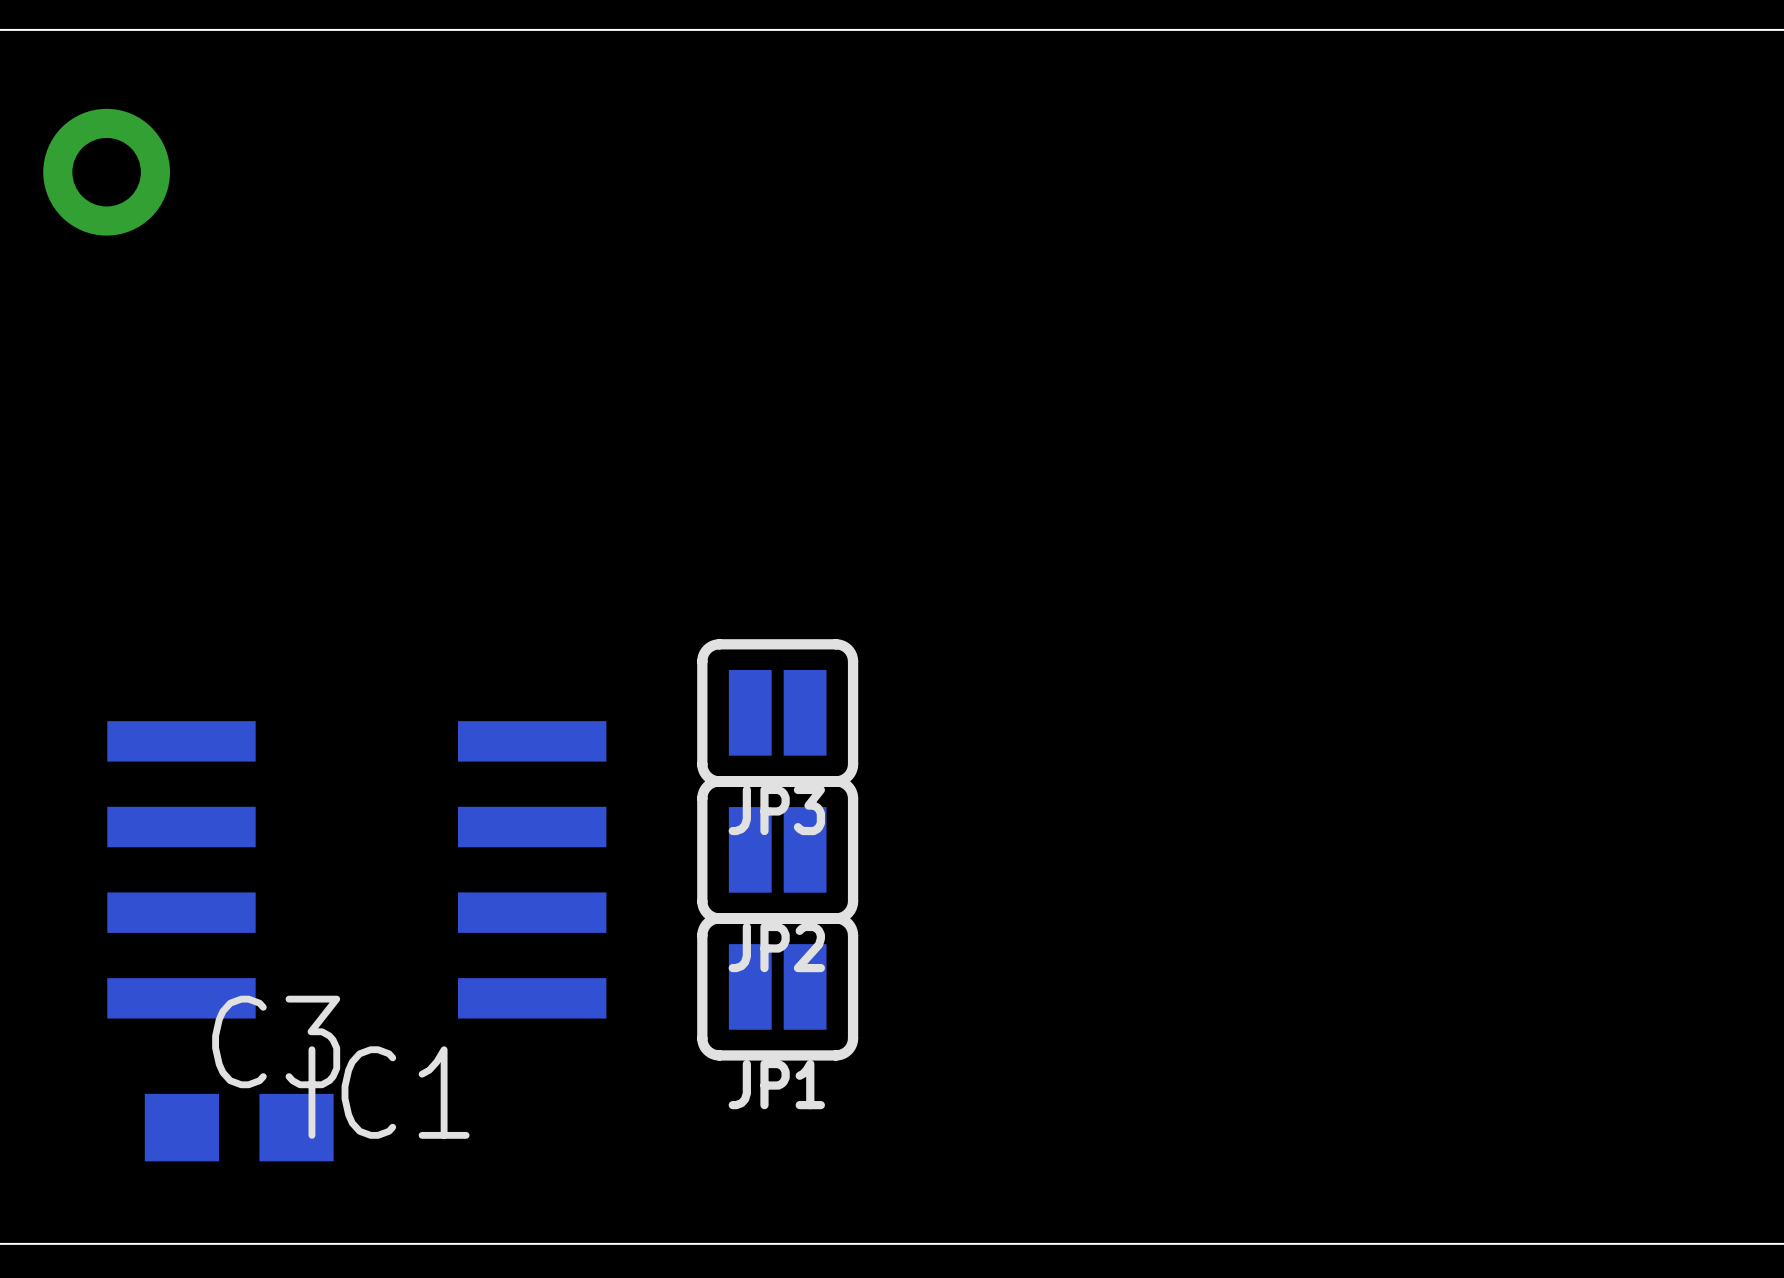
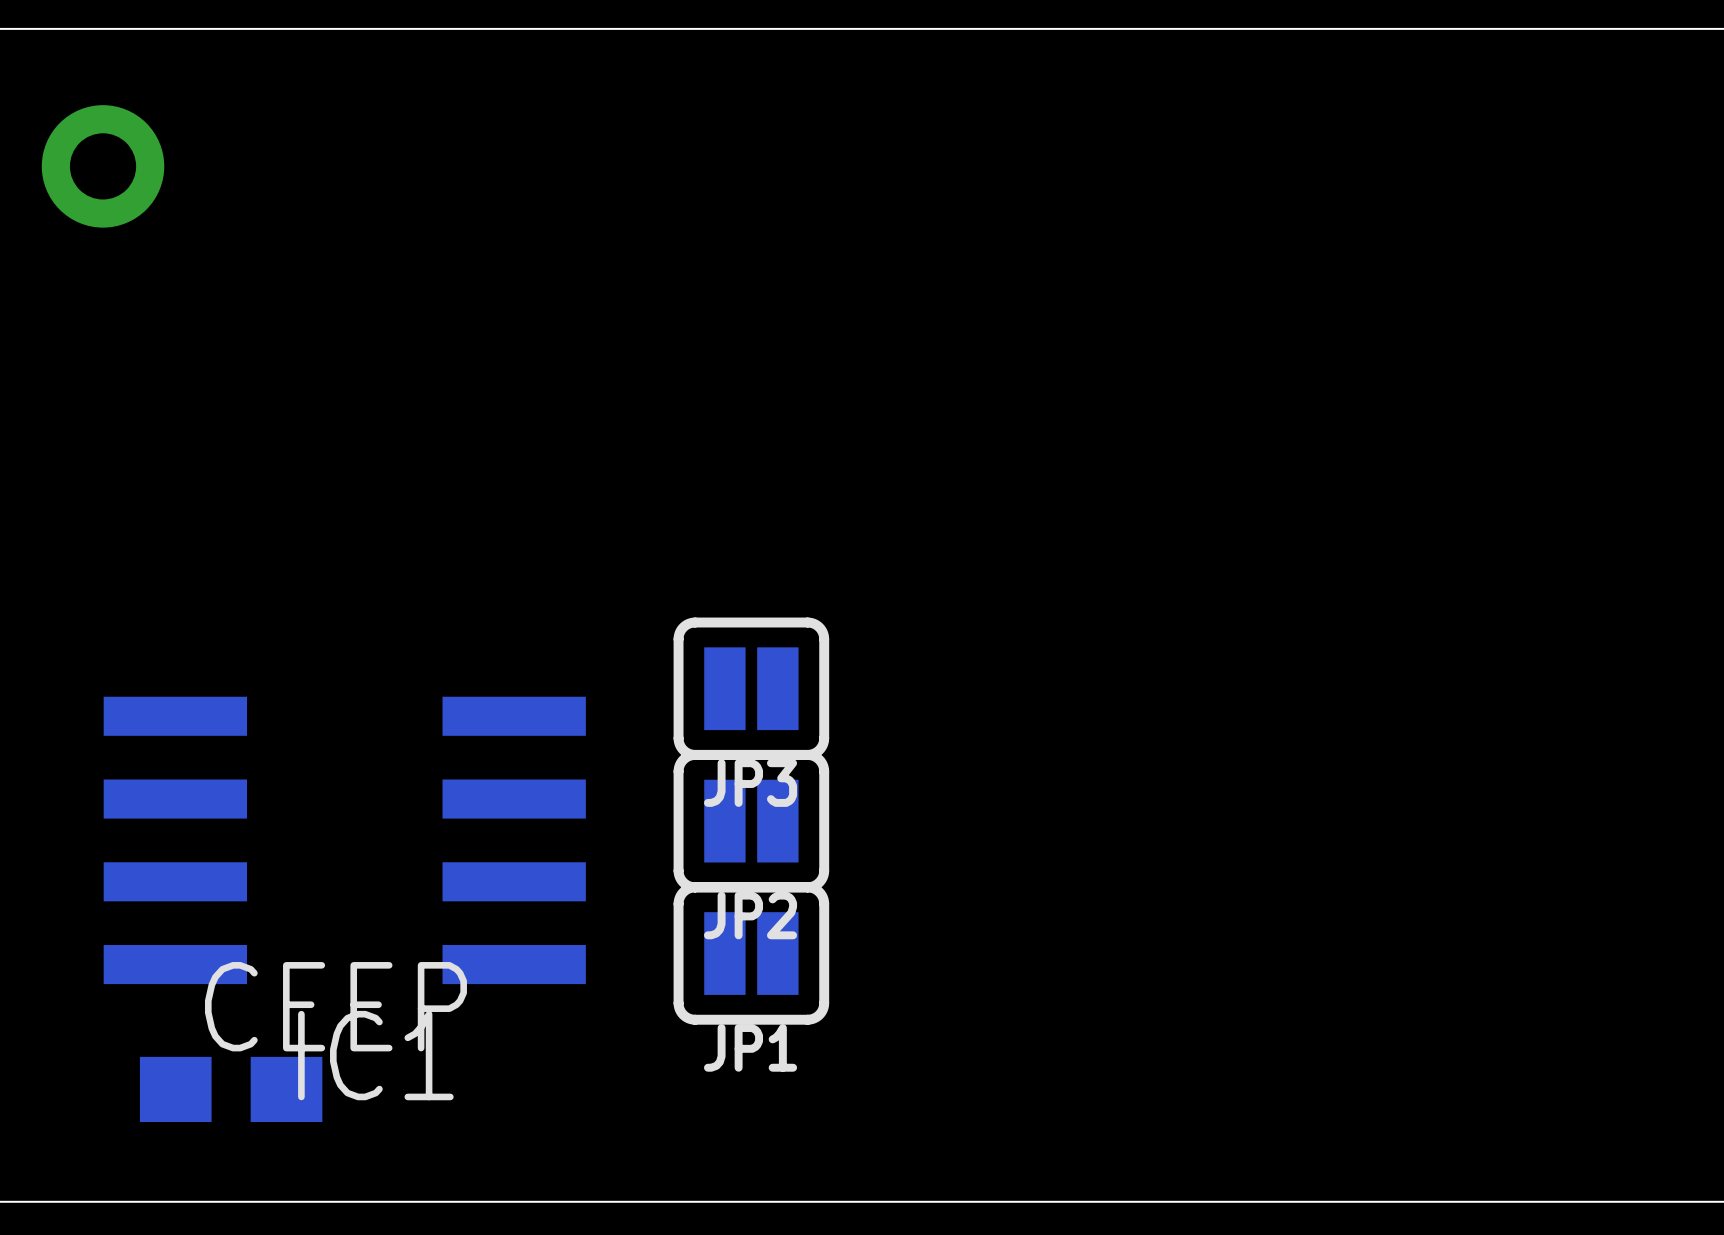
C3 name: C3 (276, 1041) -> CEEP (335, 1006)

